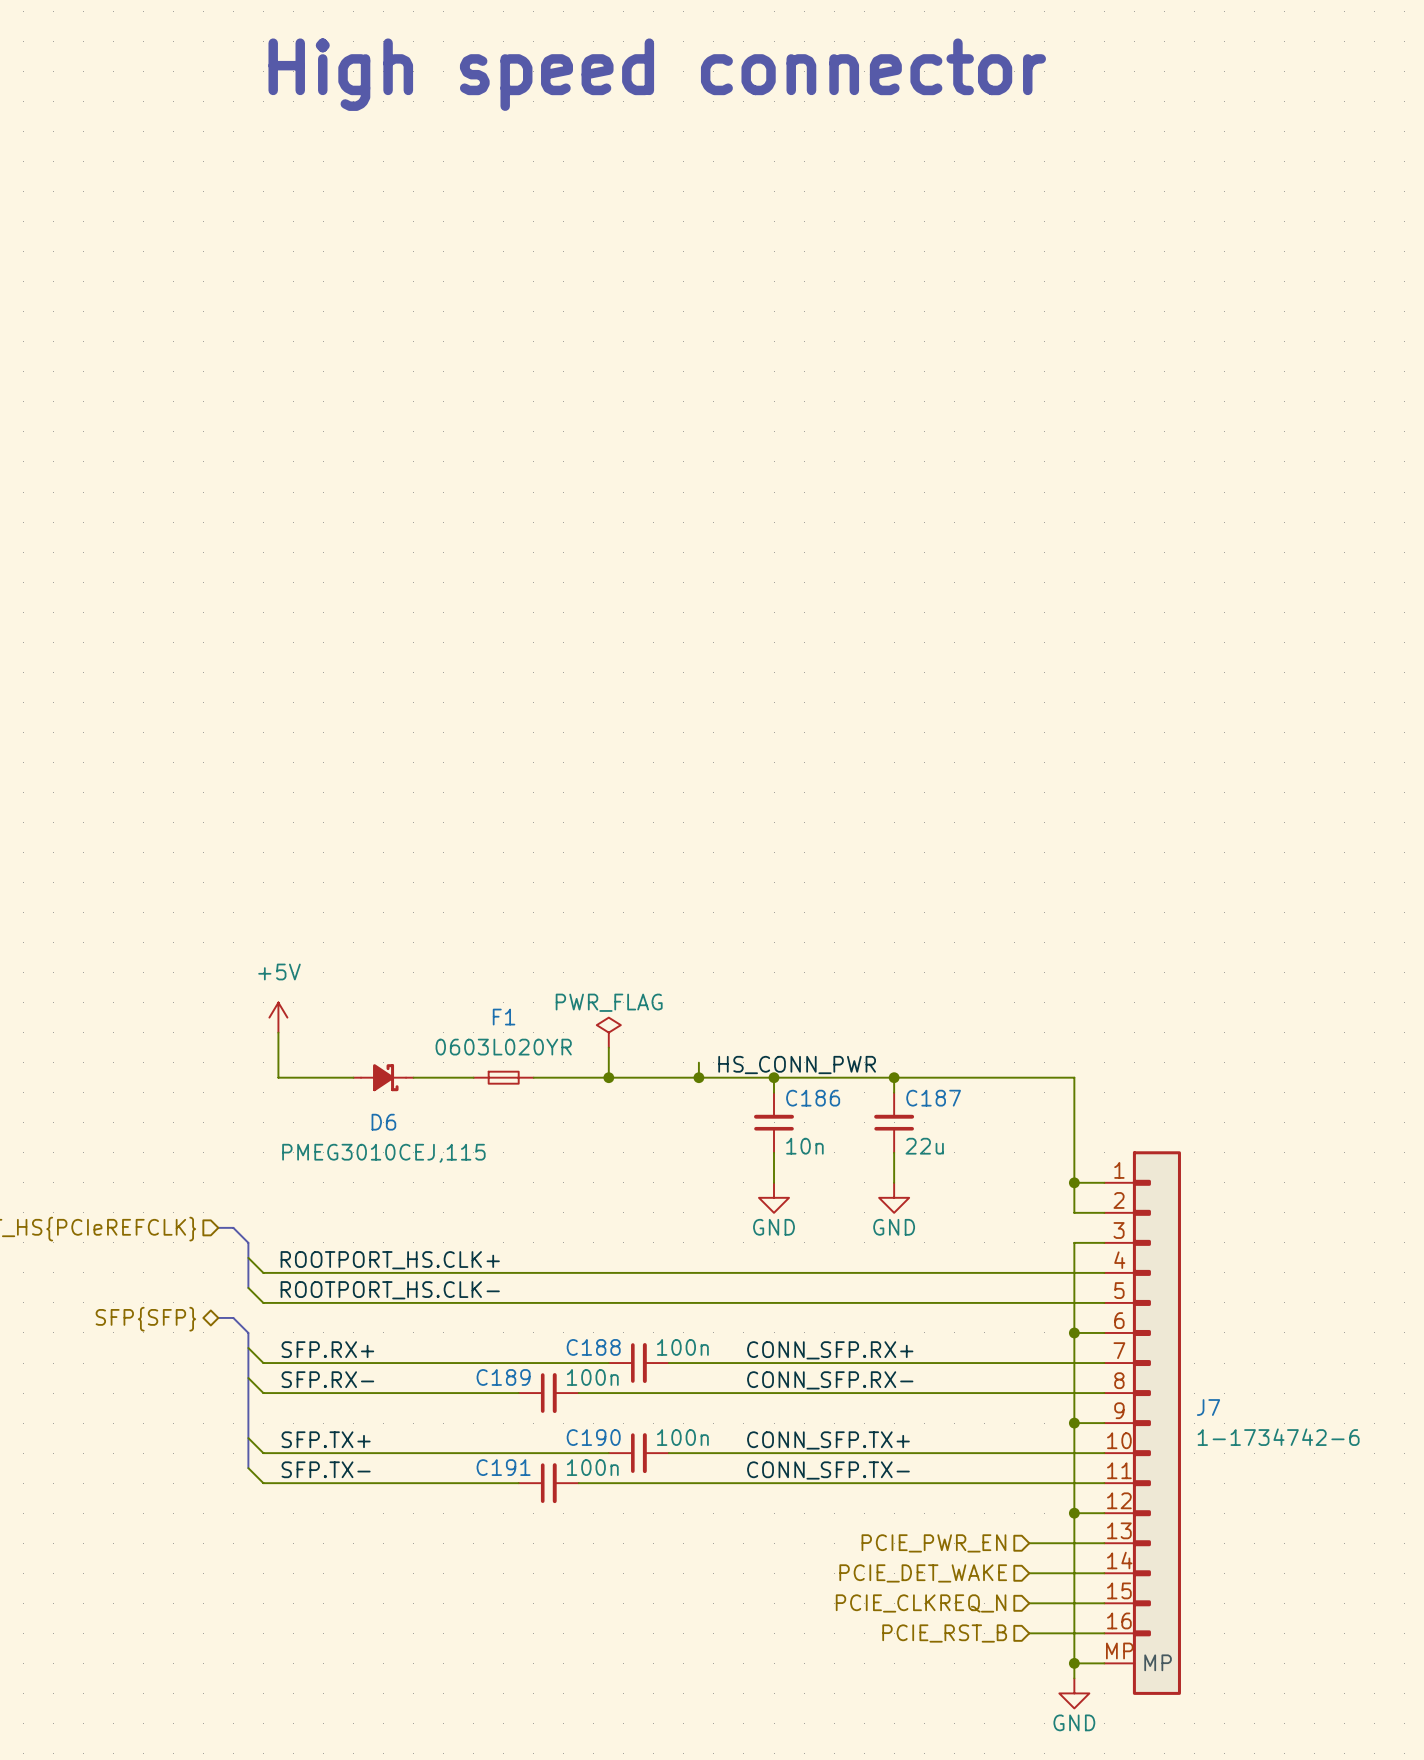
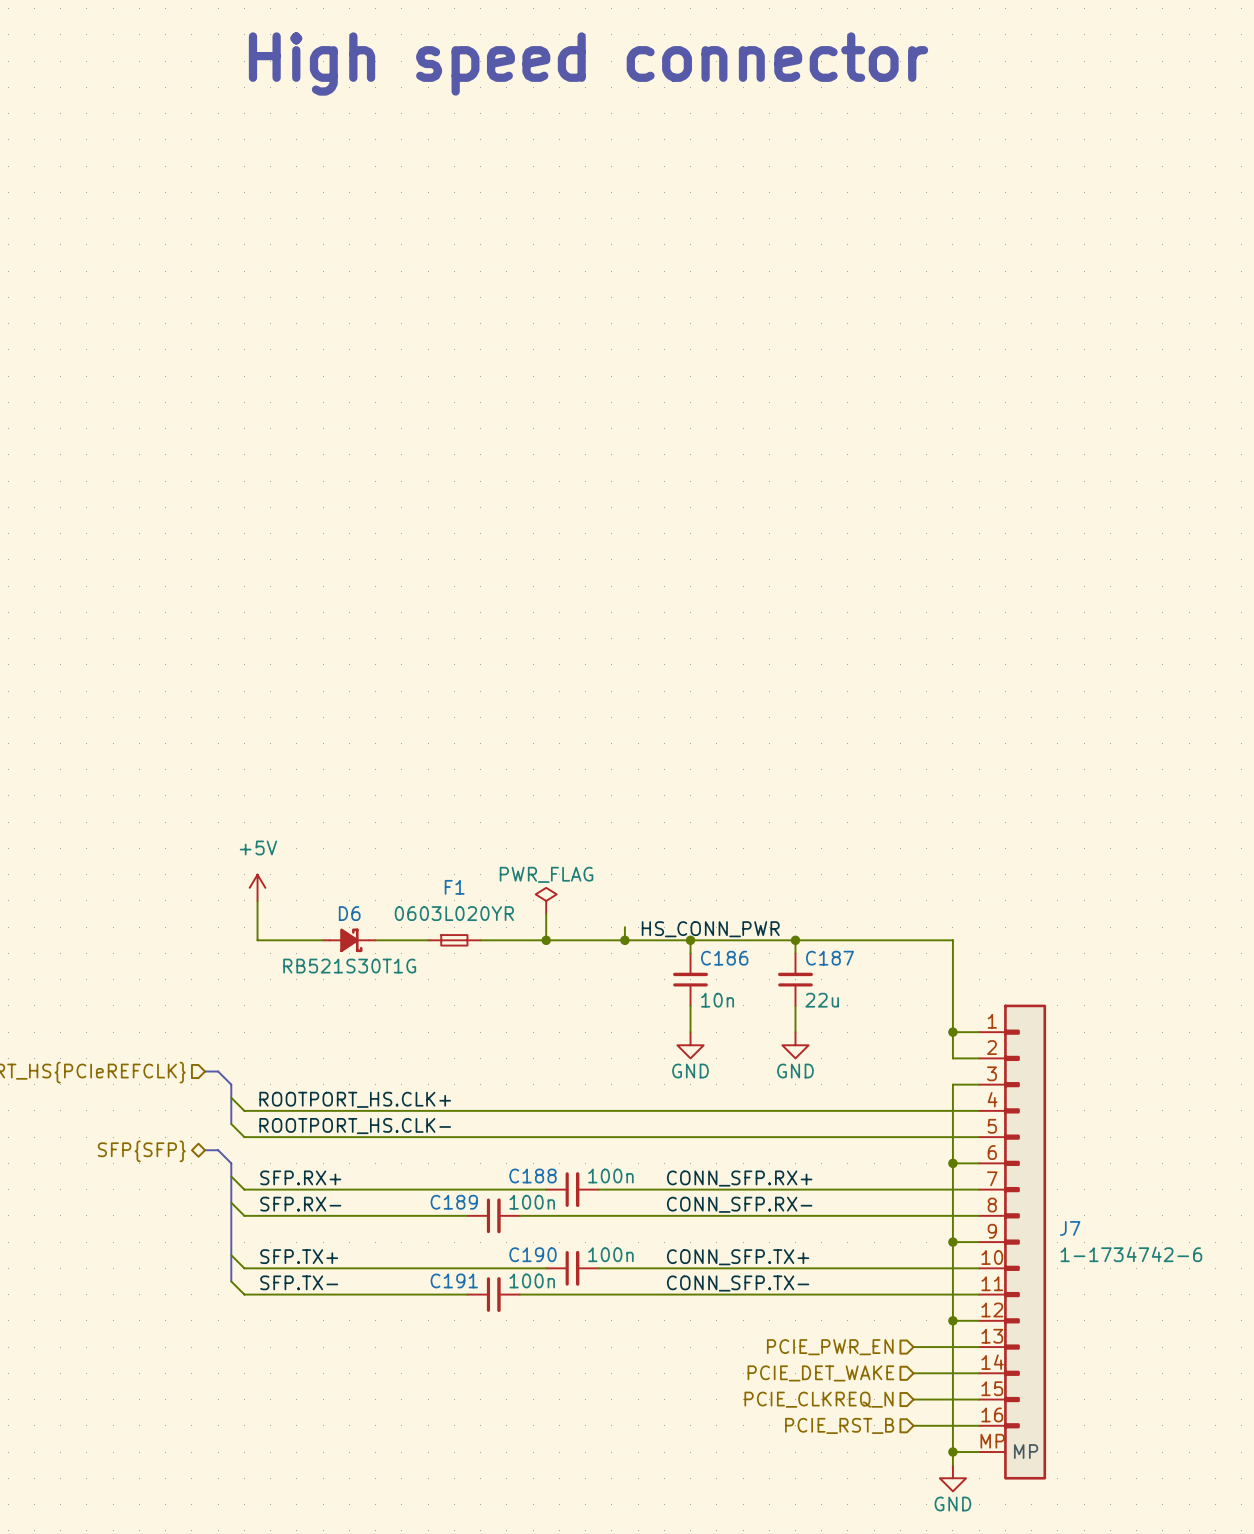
D6 name position: D6 (383, 1122) -> D6 (349, 913)
D6 text: PMEG3010CEJ,115 (383, 1153) -> RB521S30T1G (349, 966)

